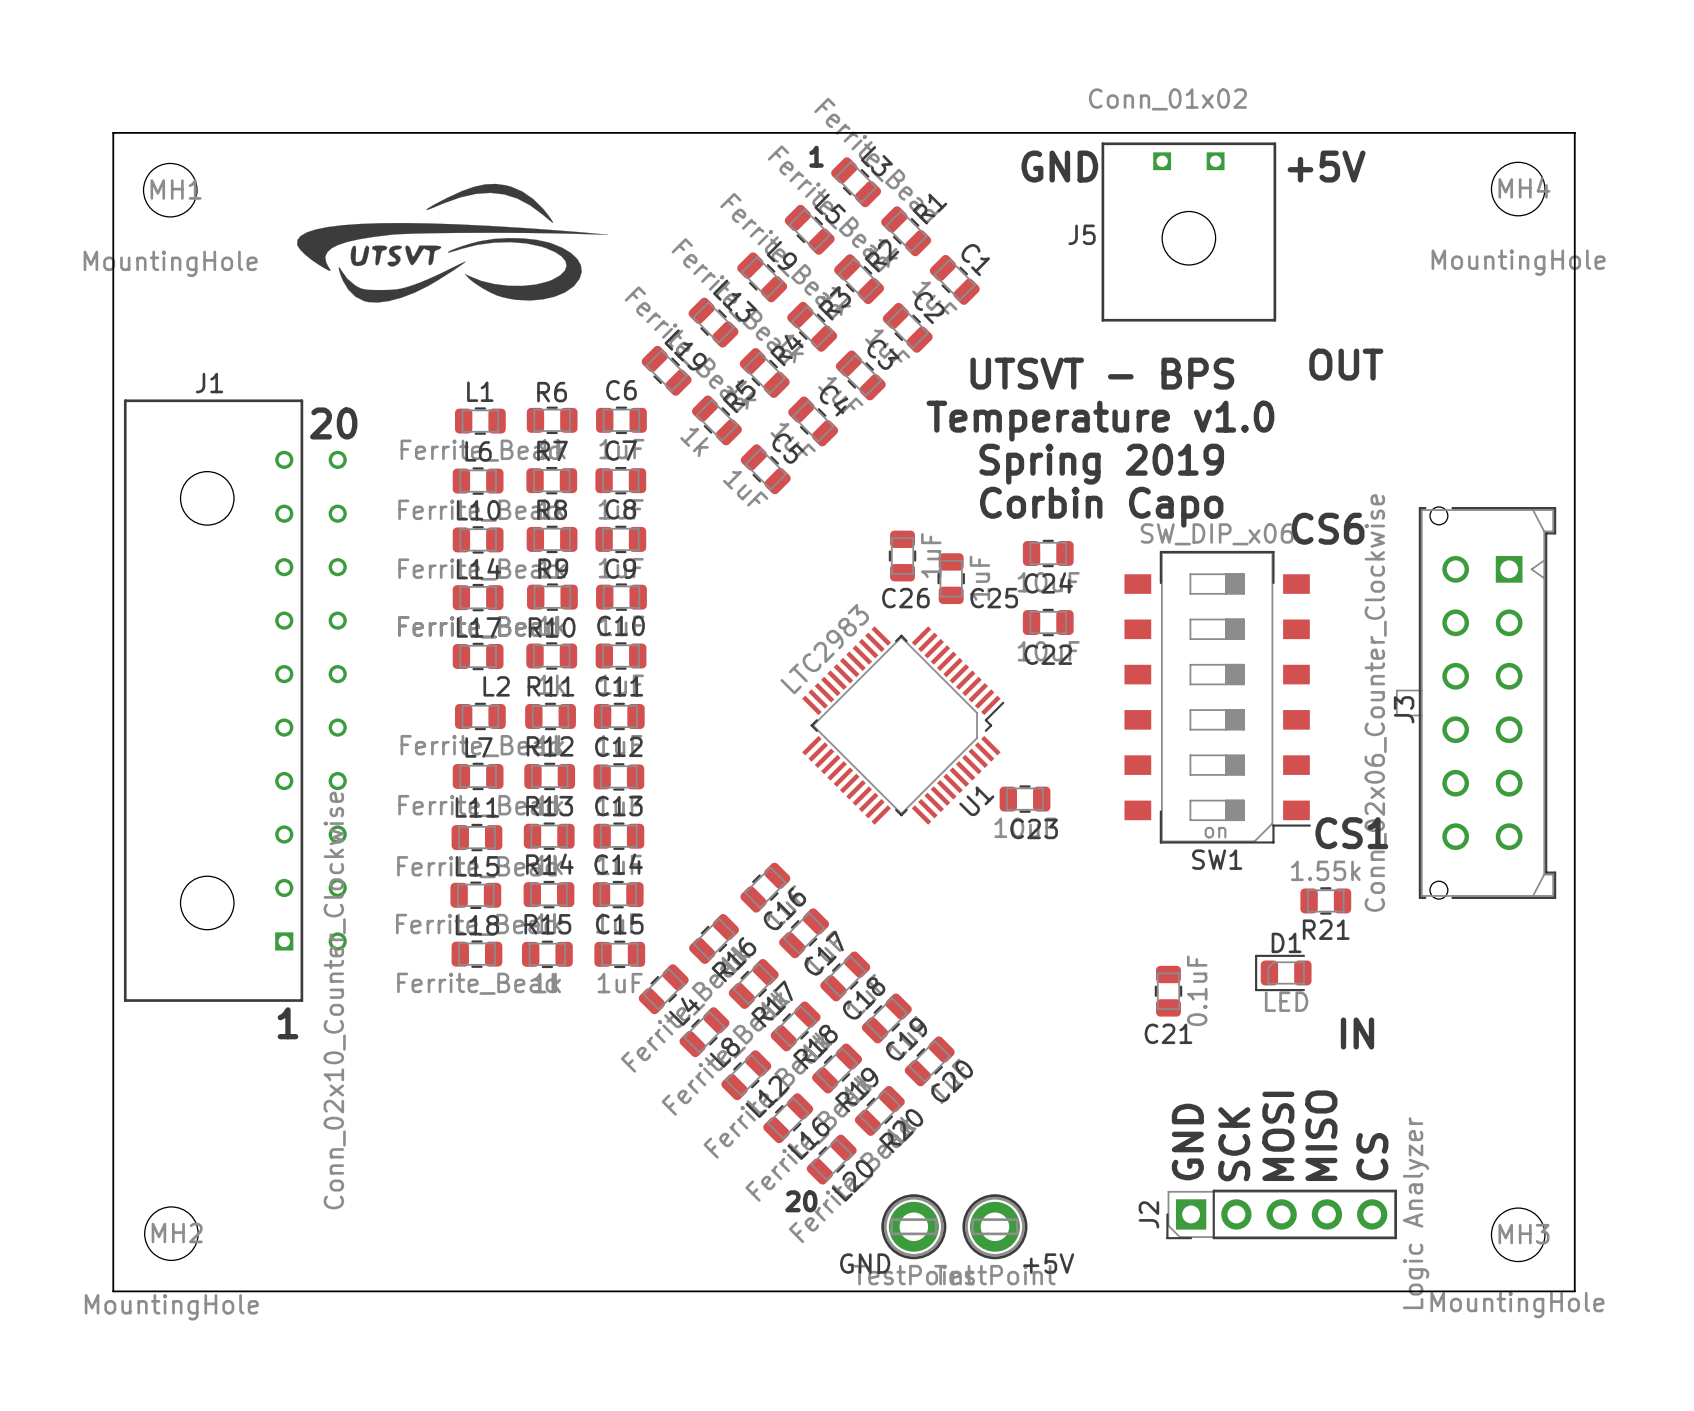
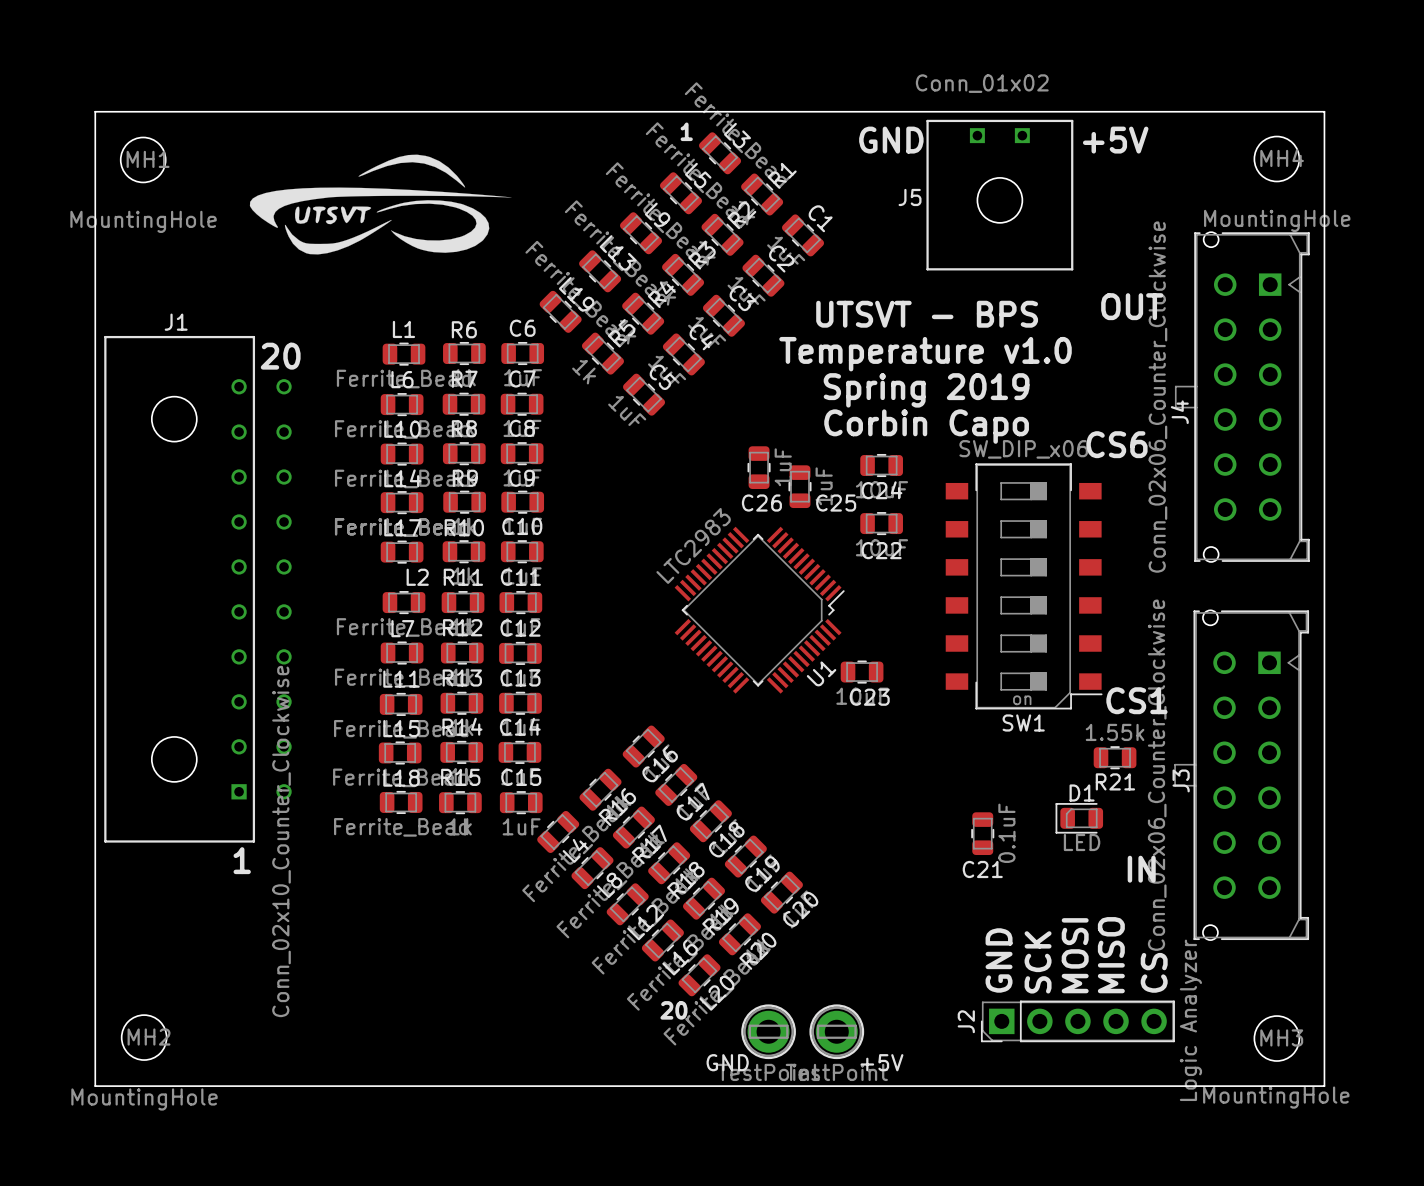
J4: none -> Conn_02x06_Counter_Clockwise (1242, 397)
J3 position: (1476, 703) -> (1241, 775)

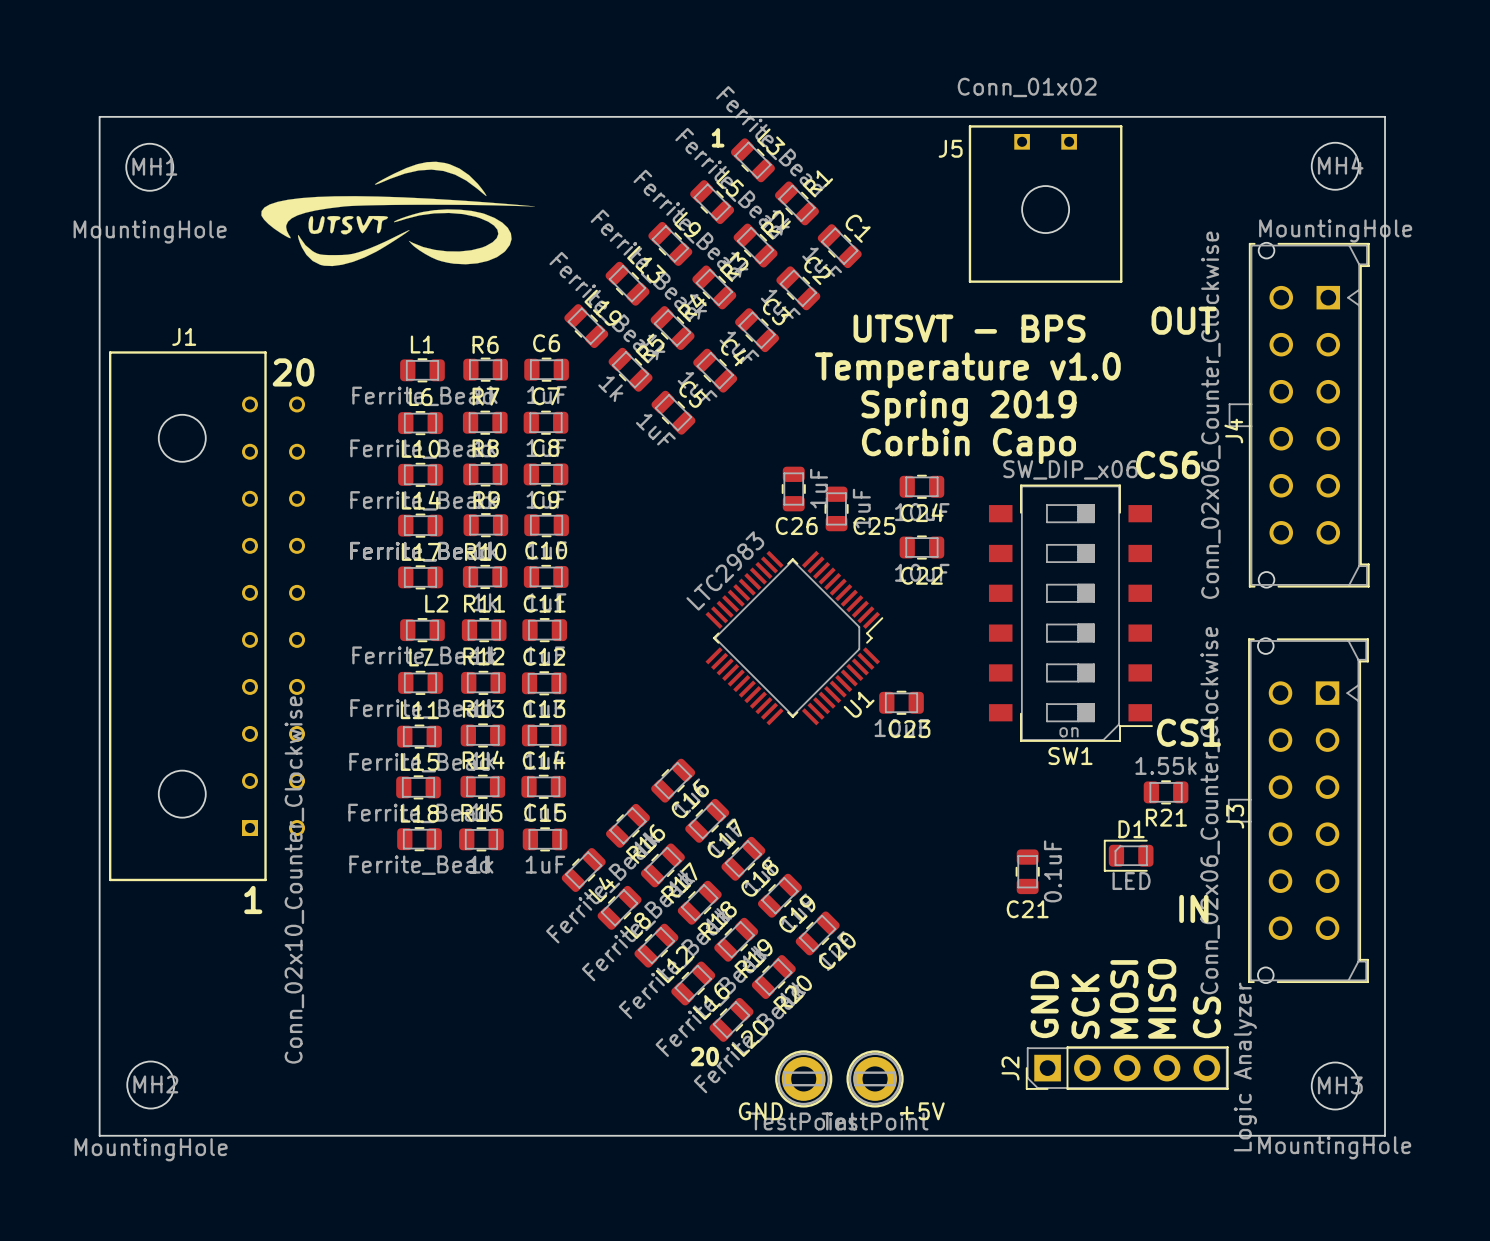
text: GND (891, 140) -> none
text: +5V (1115, 140) -> none
J5 name position: J5 (910, 197) -> J5 (950, 148)

